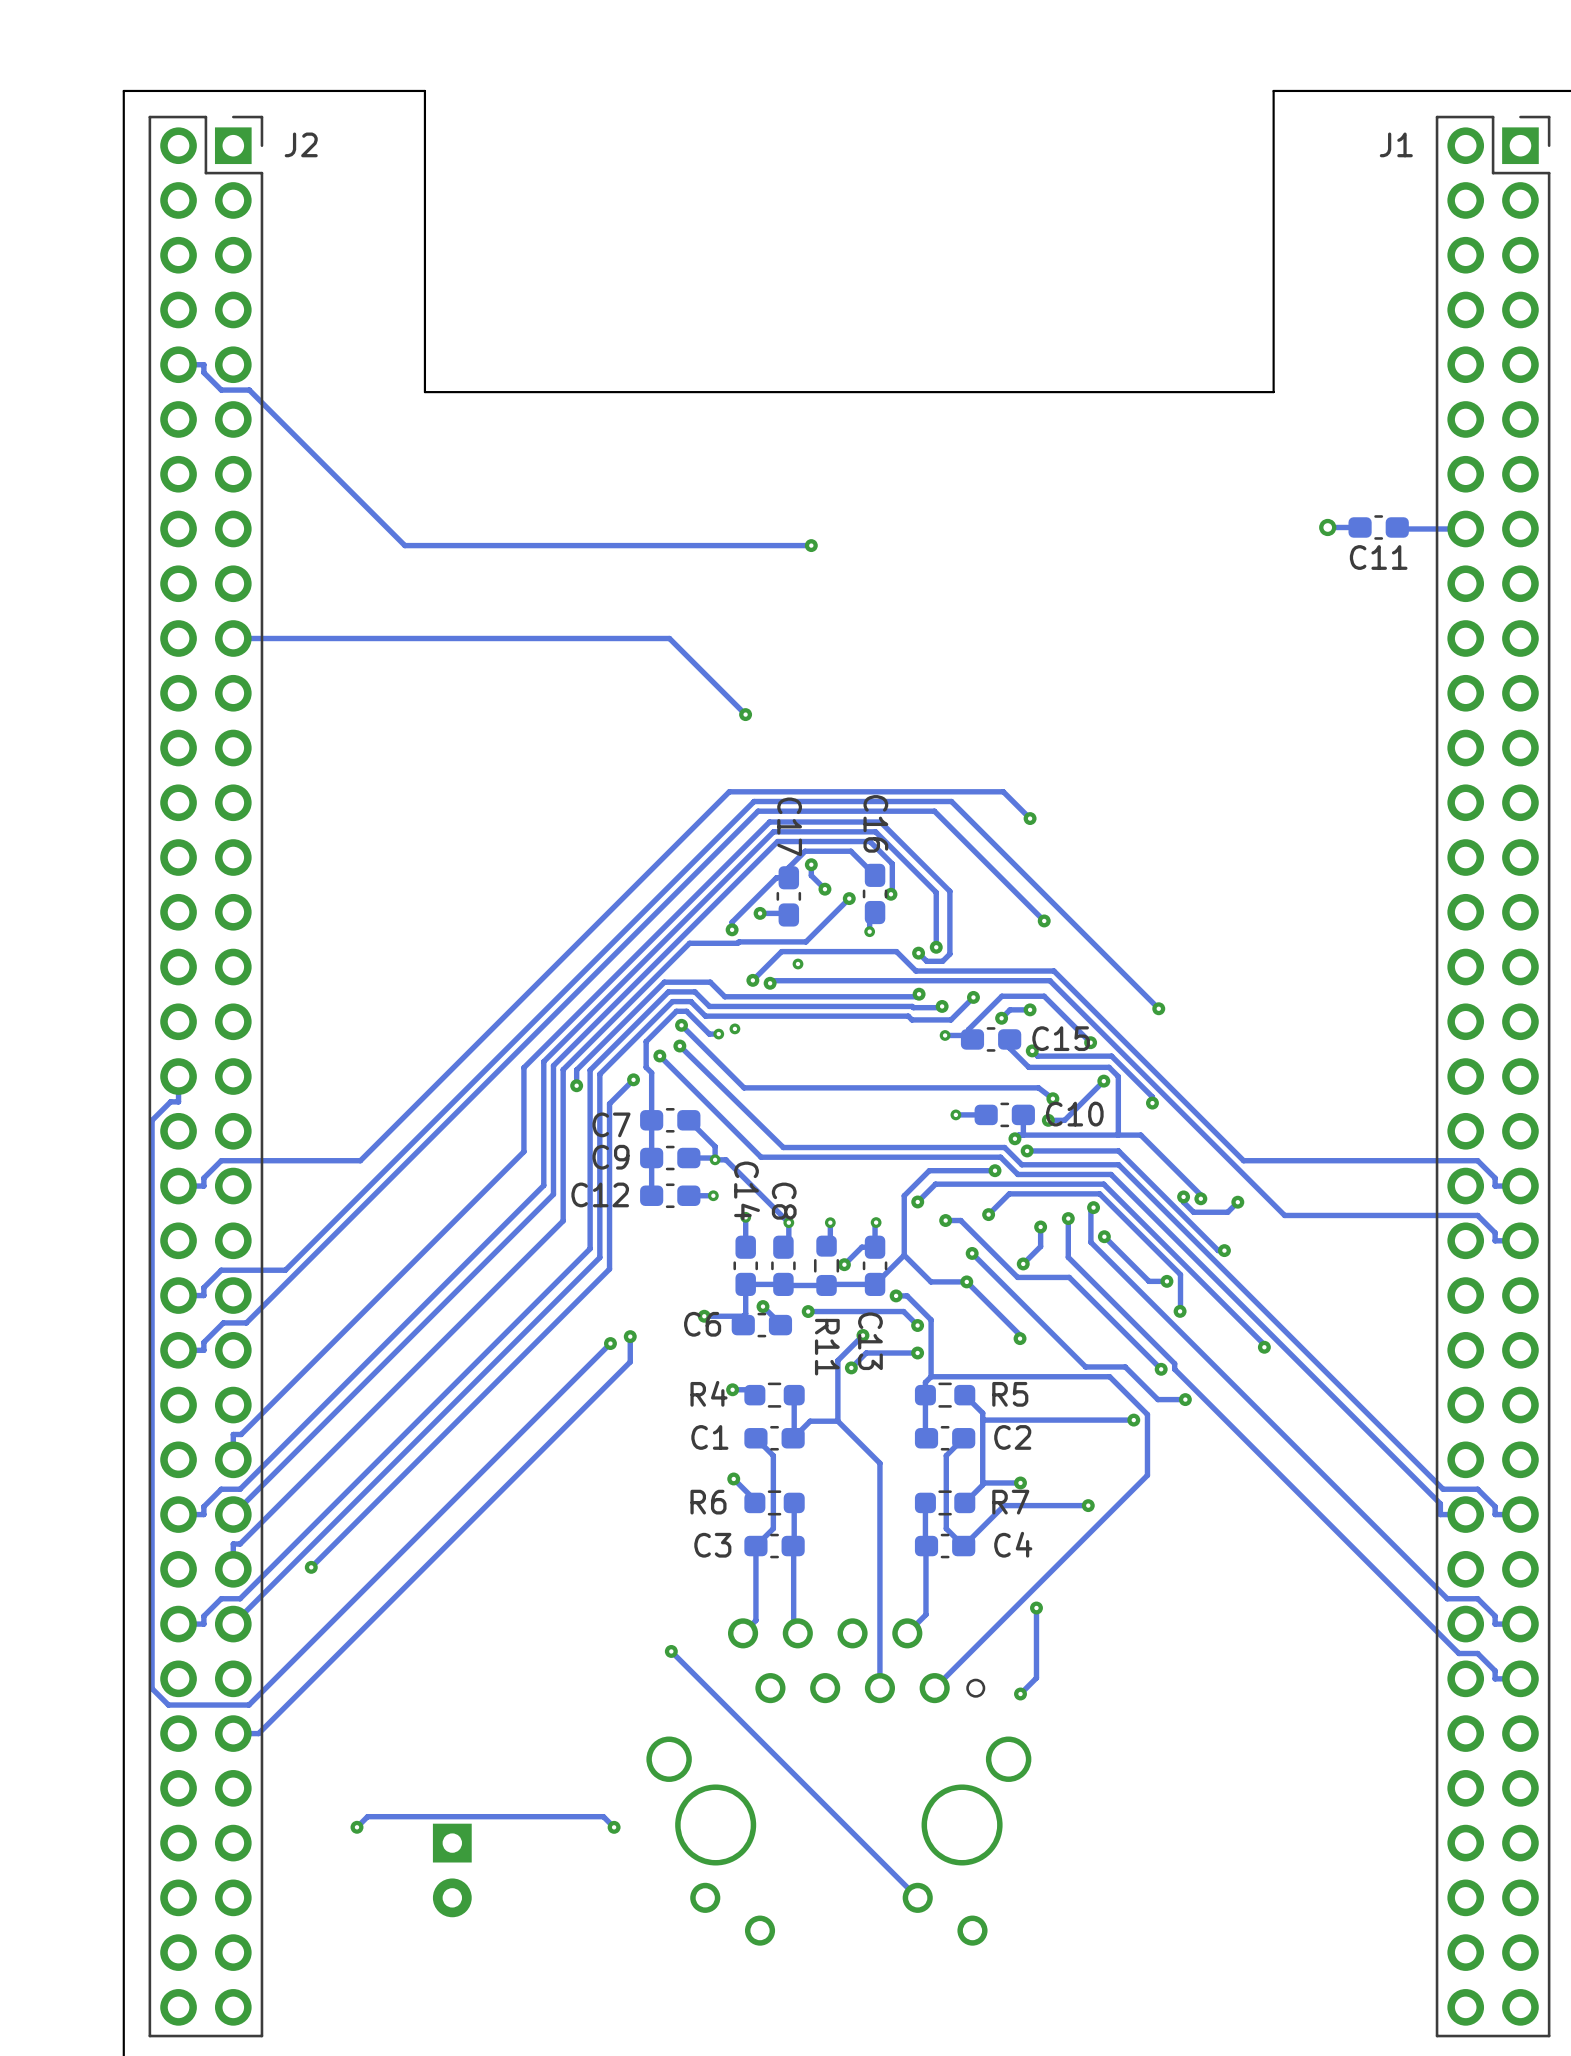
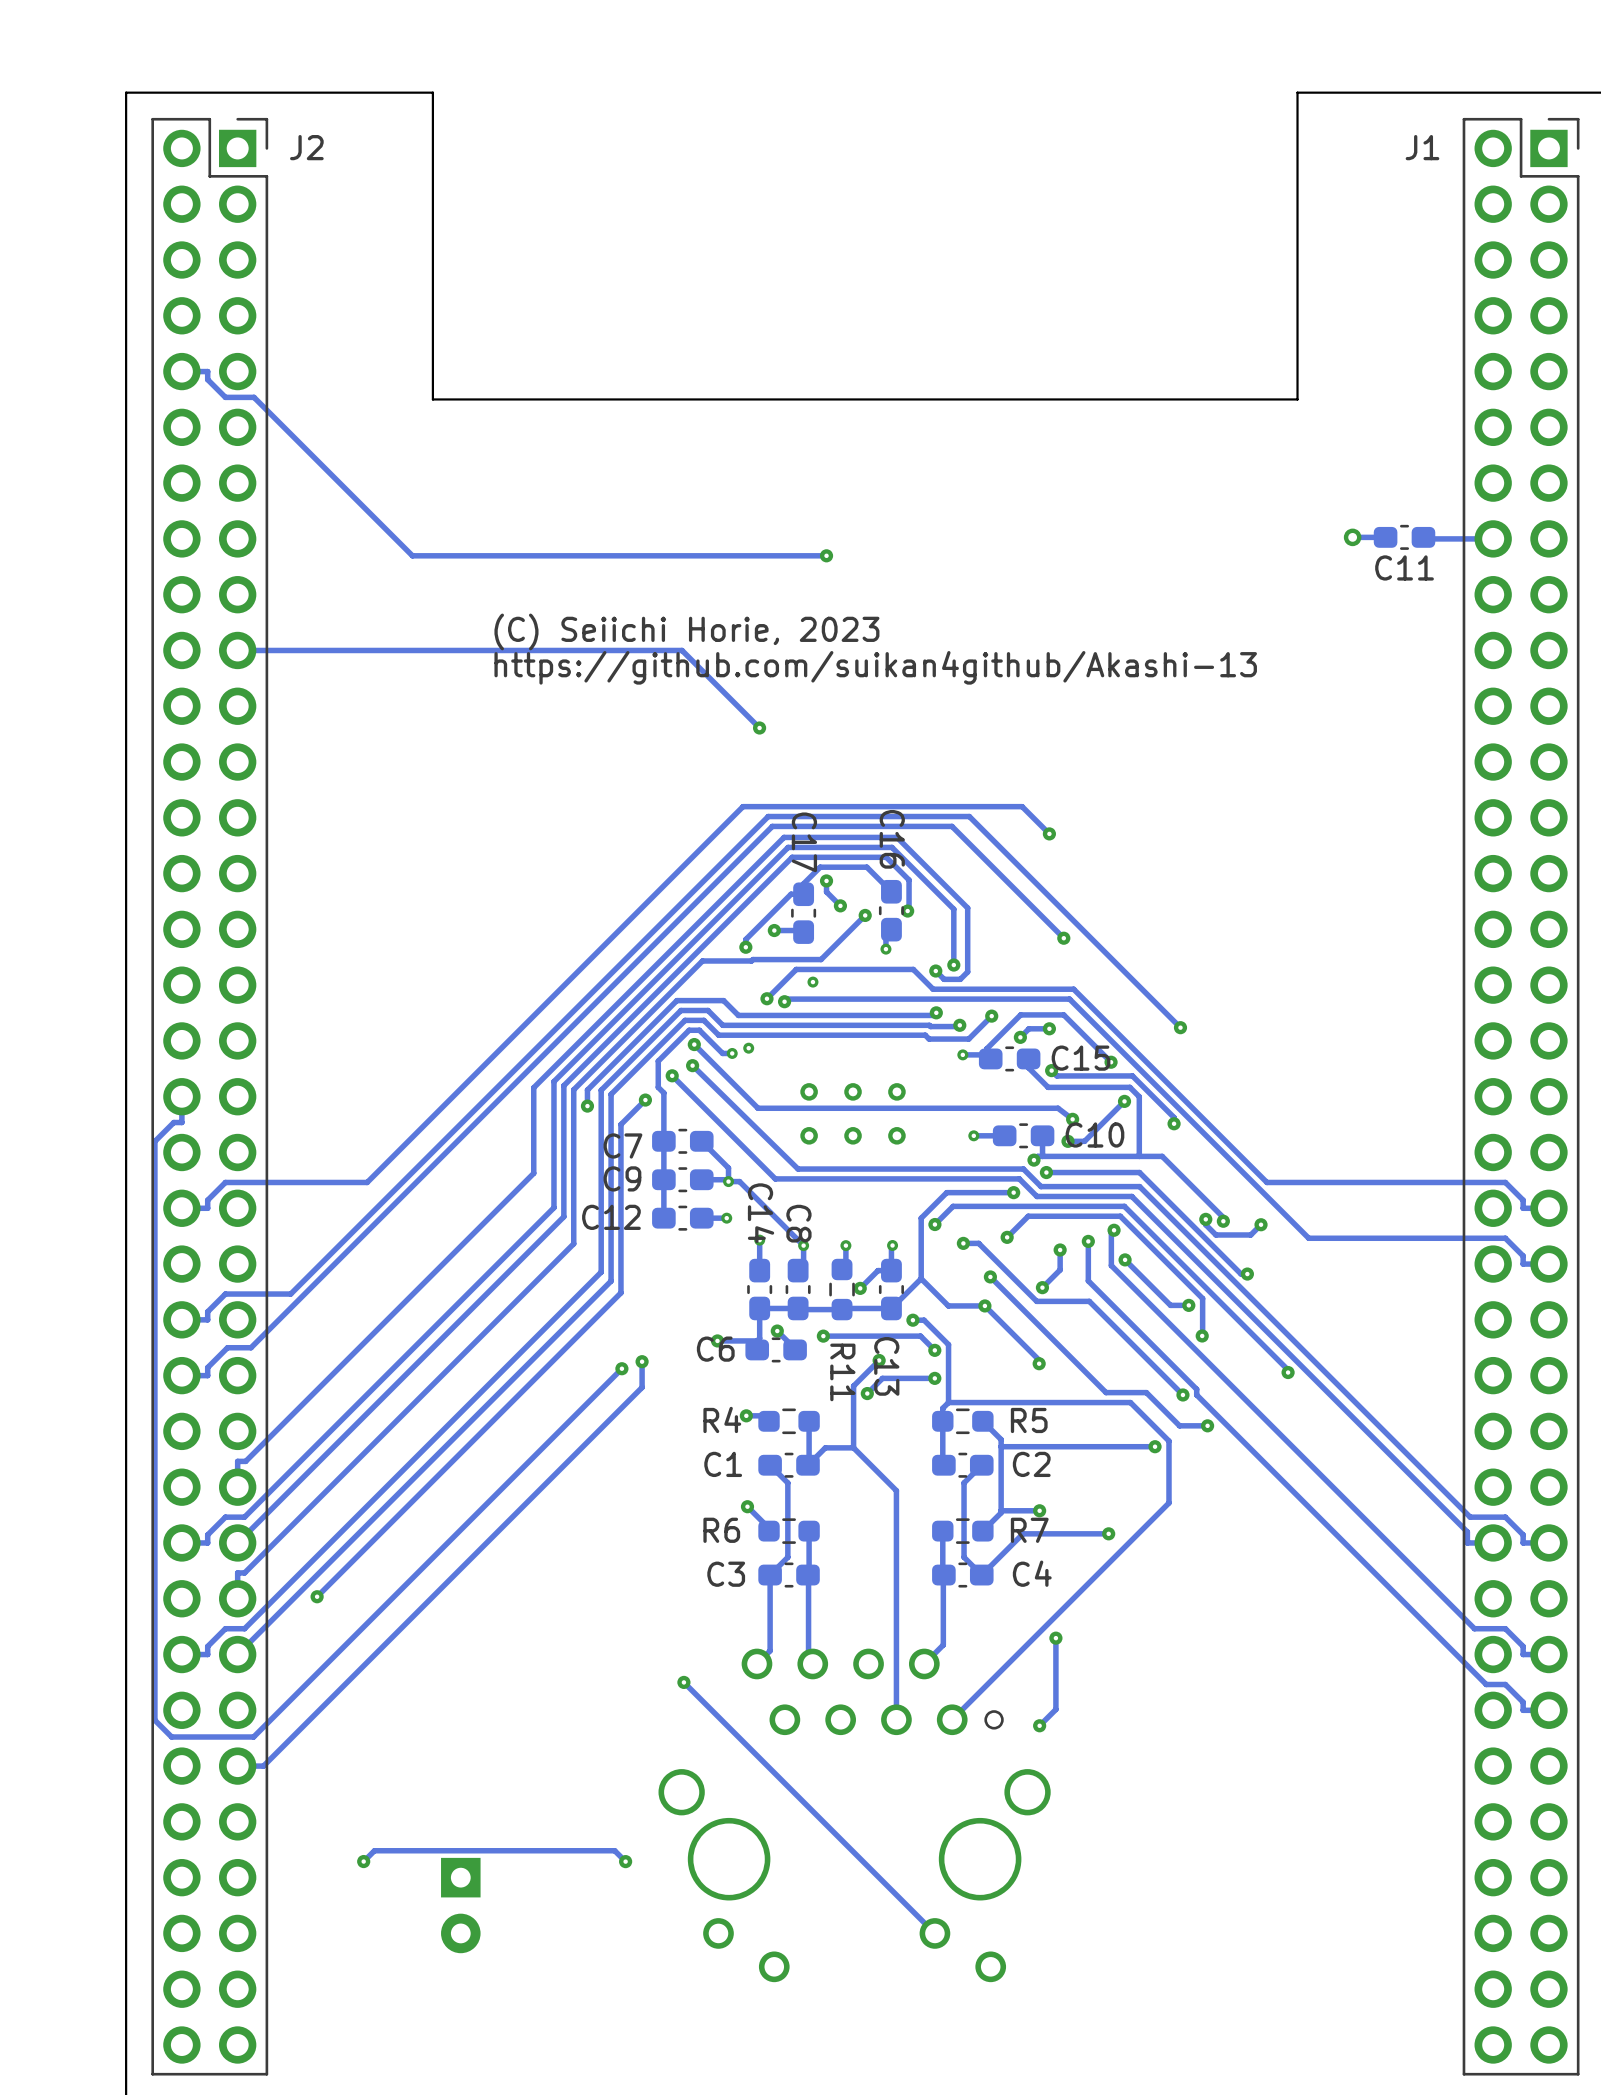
text: none -> (C) Seiichi Horie, 2023 (686, 631)
text: none -> https://github.com/suikan4github/Akashi-13 (875, 667)
via: none -> (809, 1091)
via: none -> (853, 1091)
via: none -> (896, 1091)
via: none -> (809, 1135)
via: none -> (853, 1135)
via: none -> (896, 1135)

